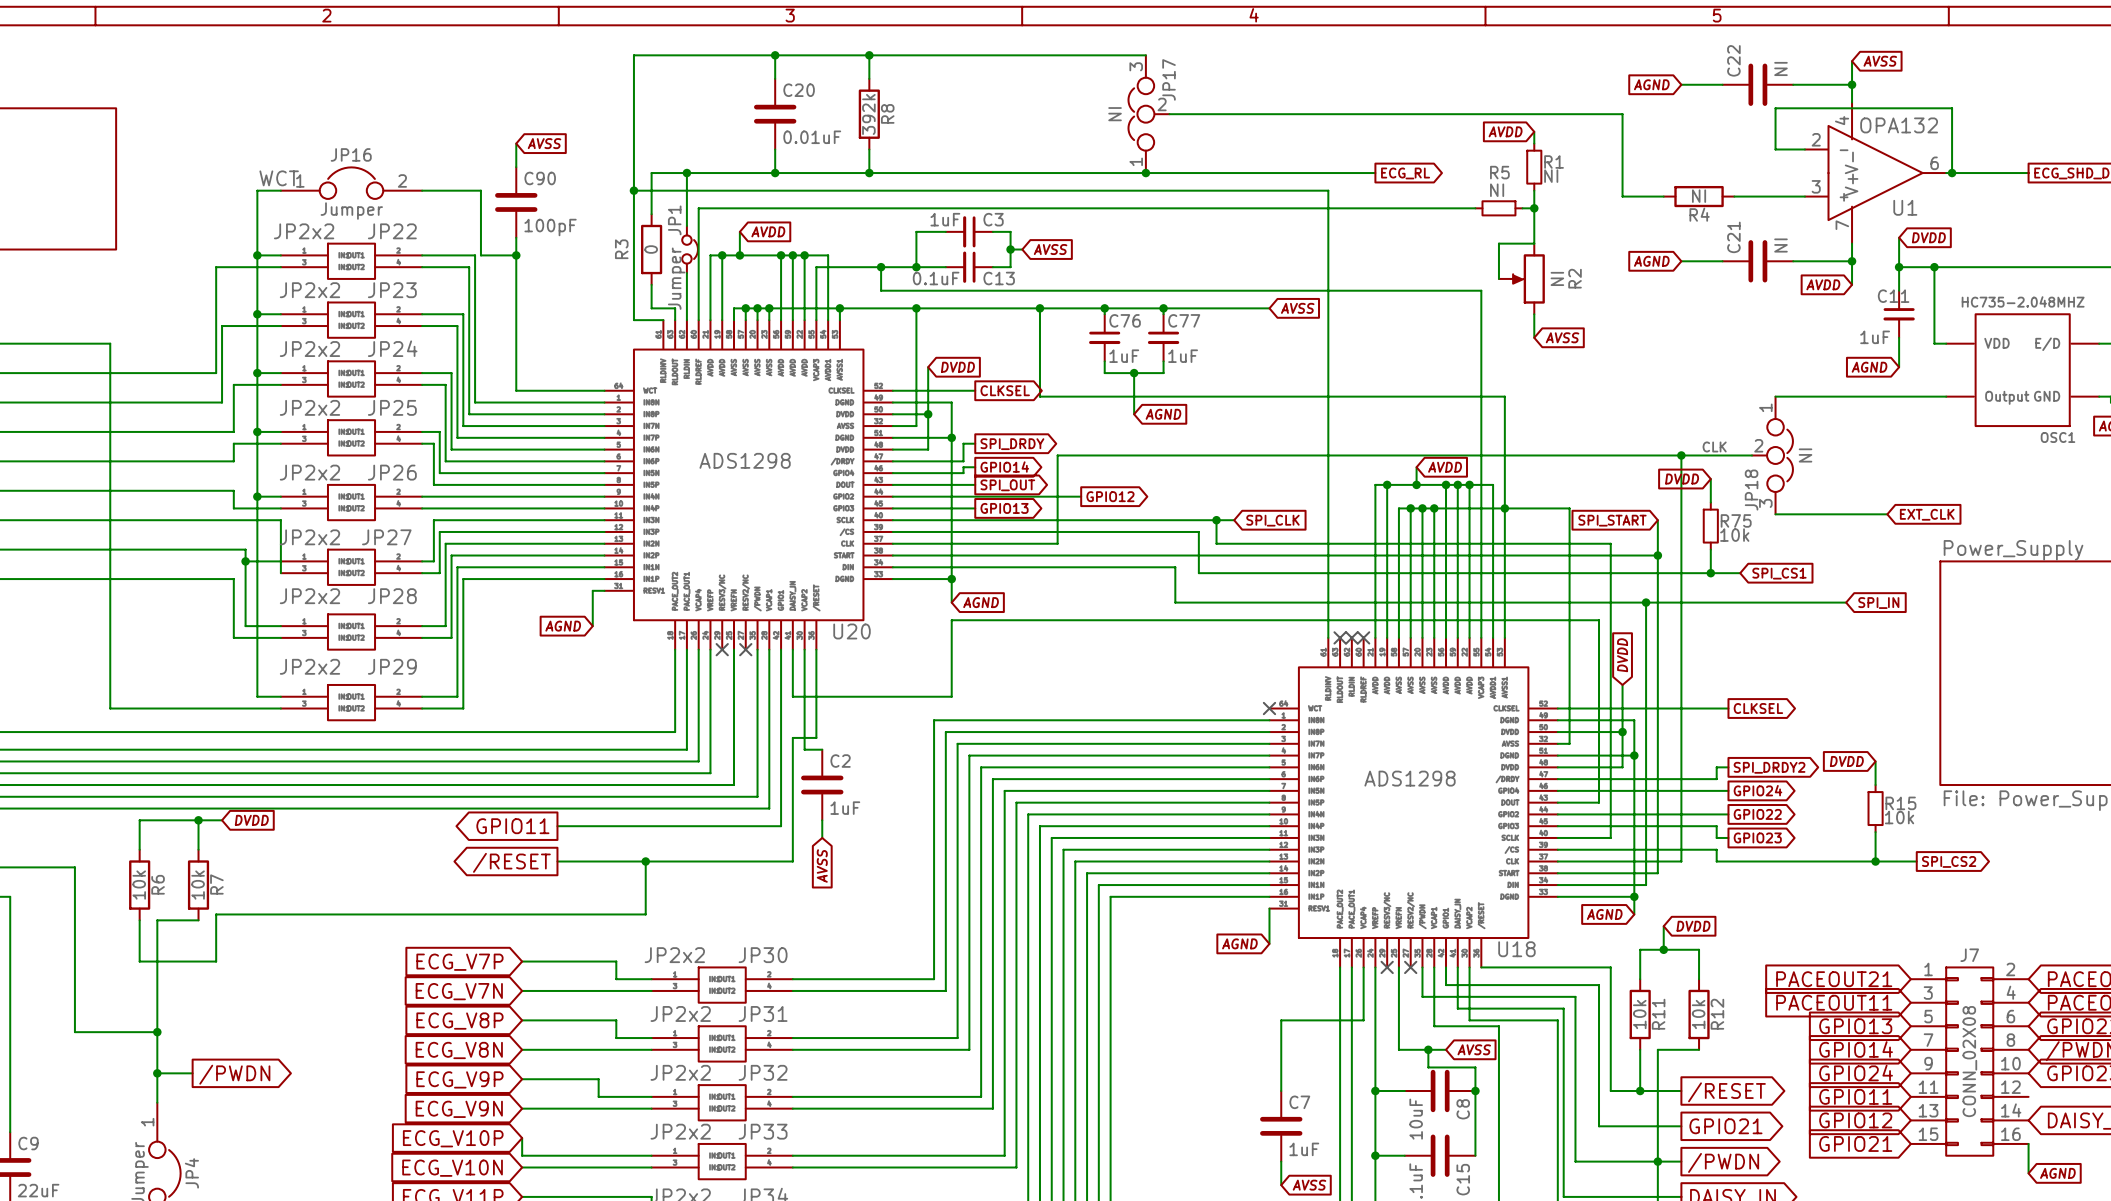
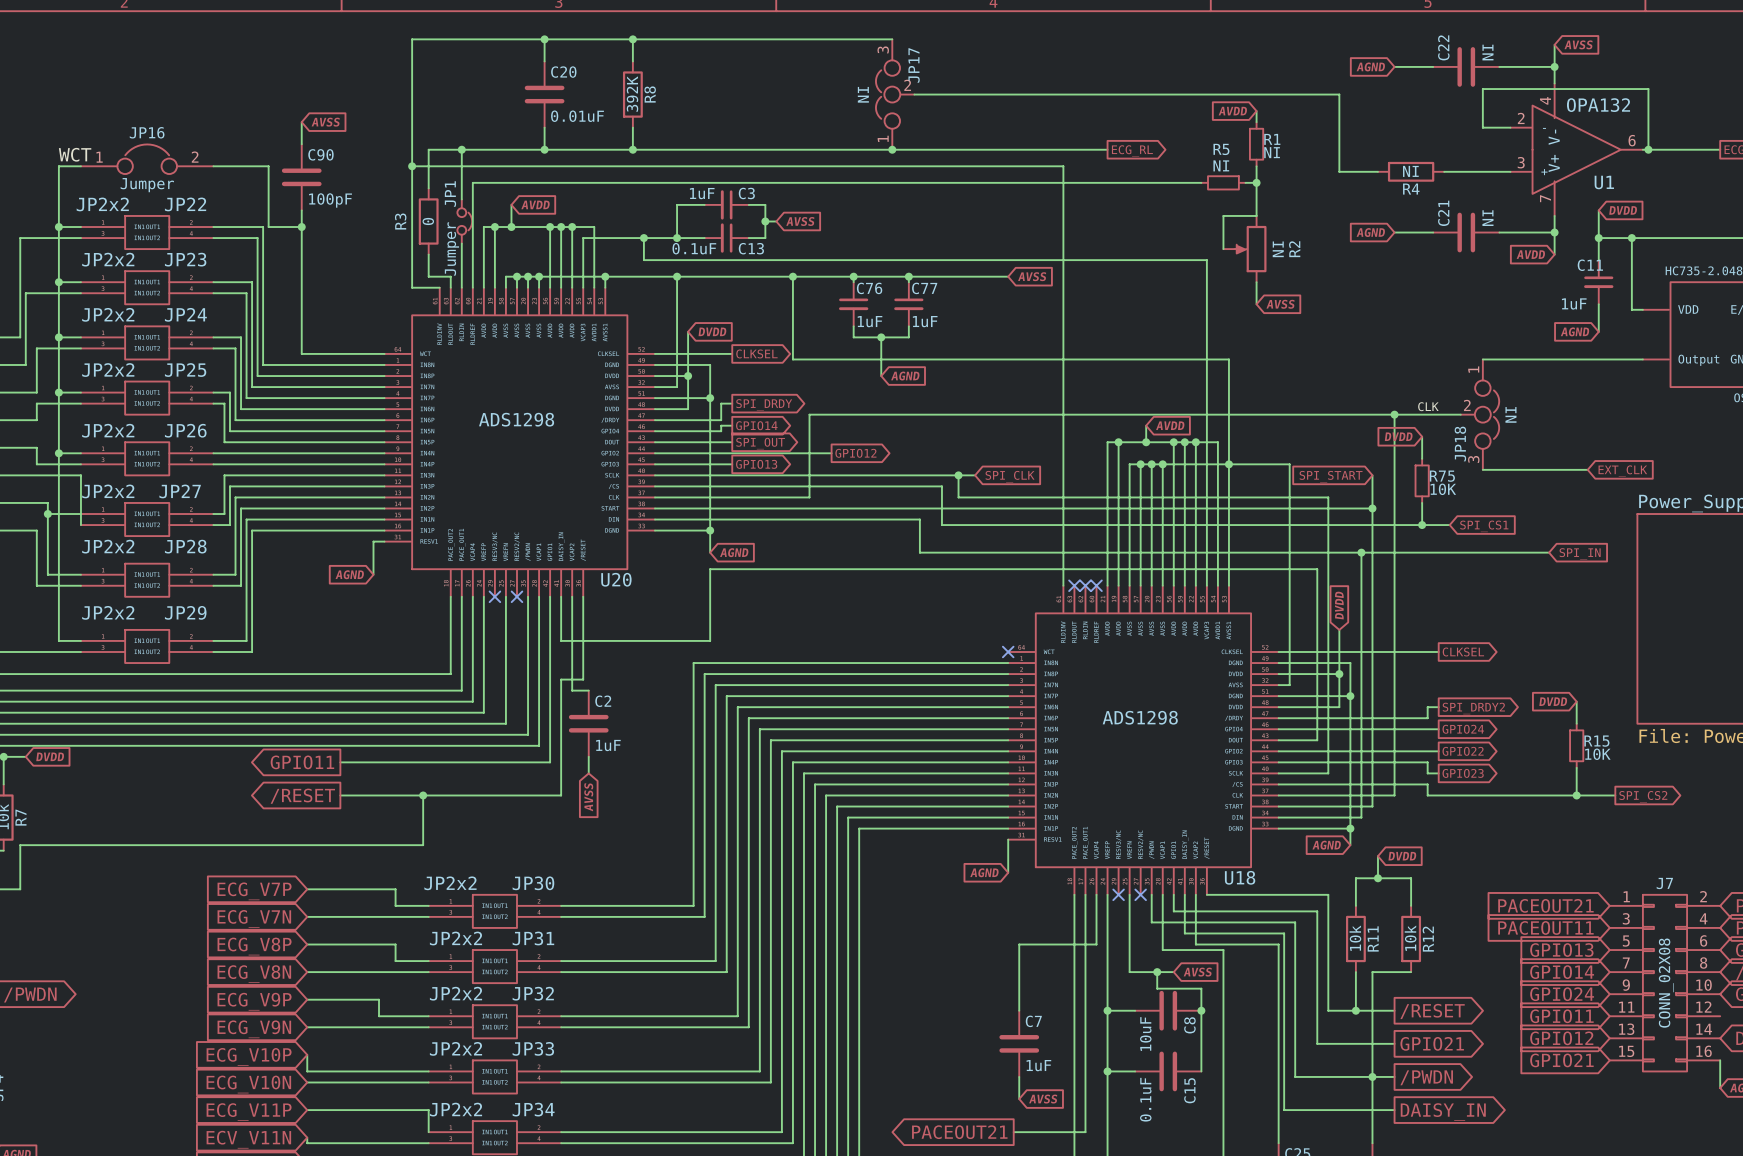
R8 value: 392k (868, 114) -> 392K (632, 94)
R75 value: 10k (1734, 535) -> 10K (1443, 489)
R15 value: 10k (1899, 817) -> 10K (1597, 754)

